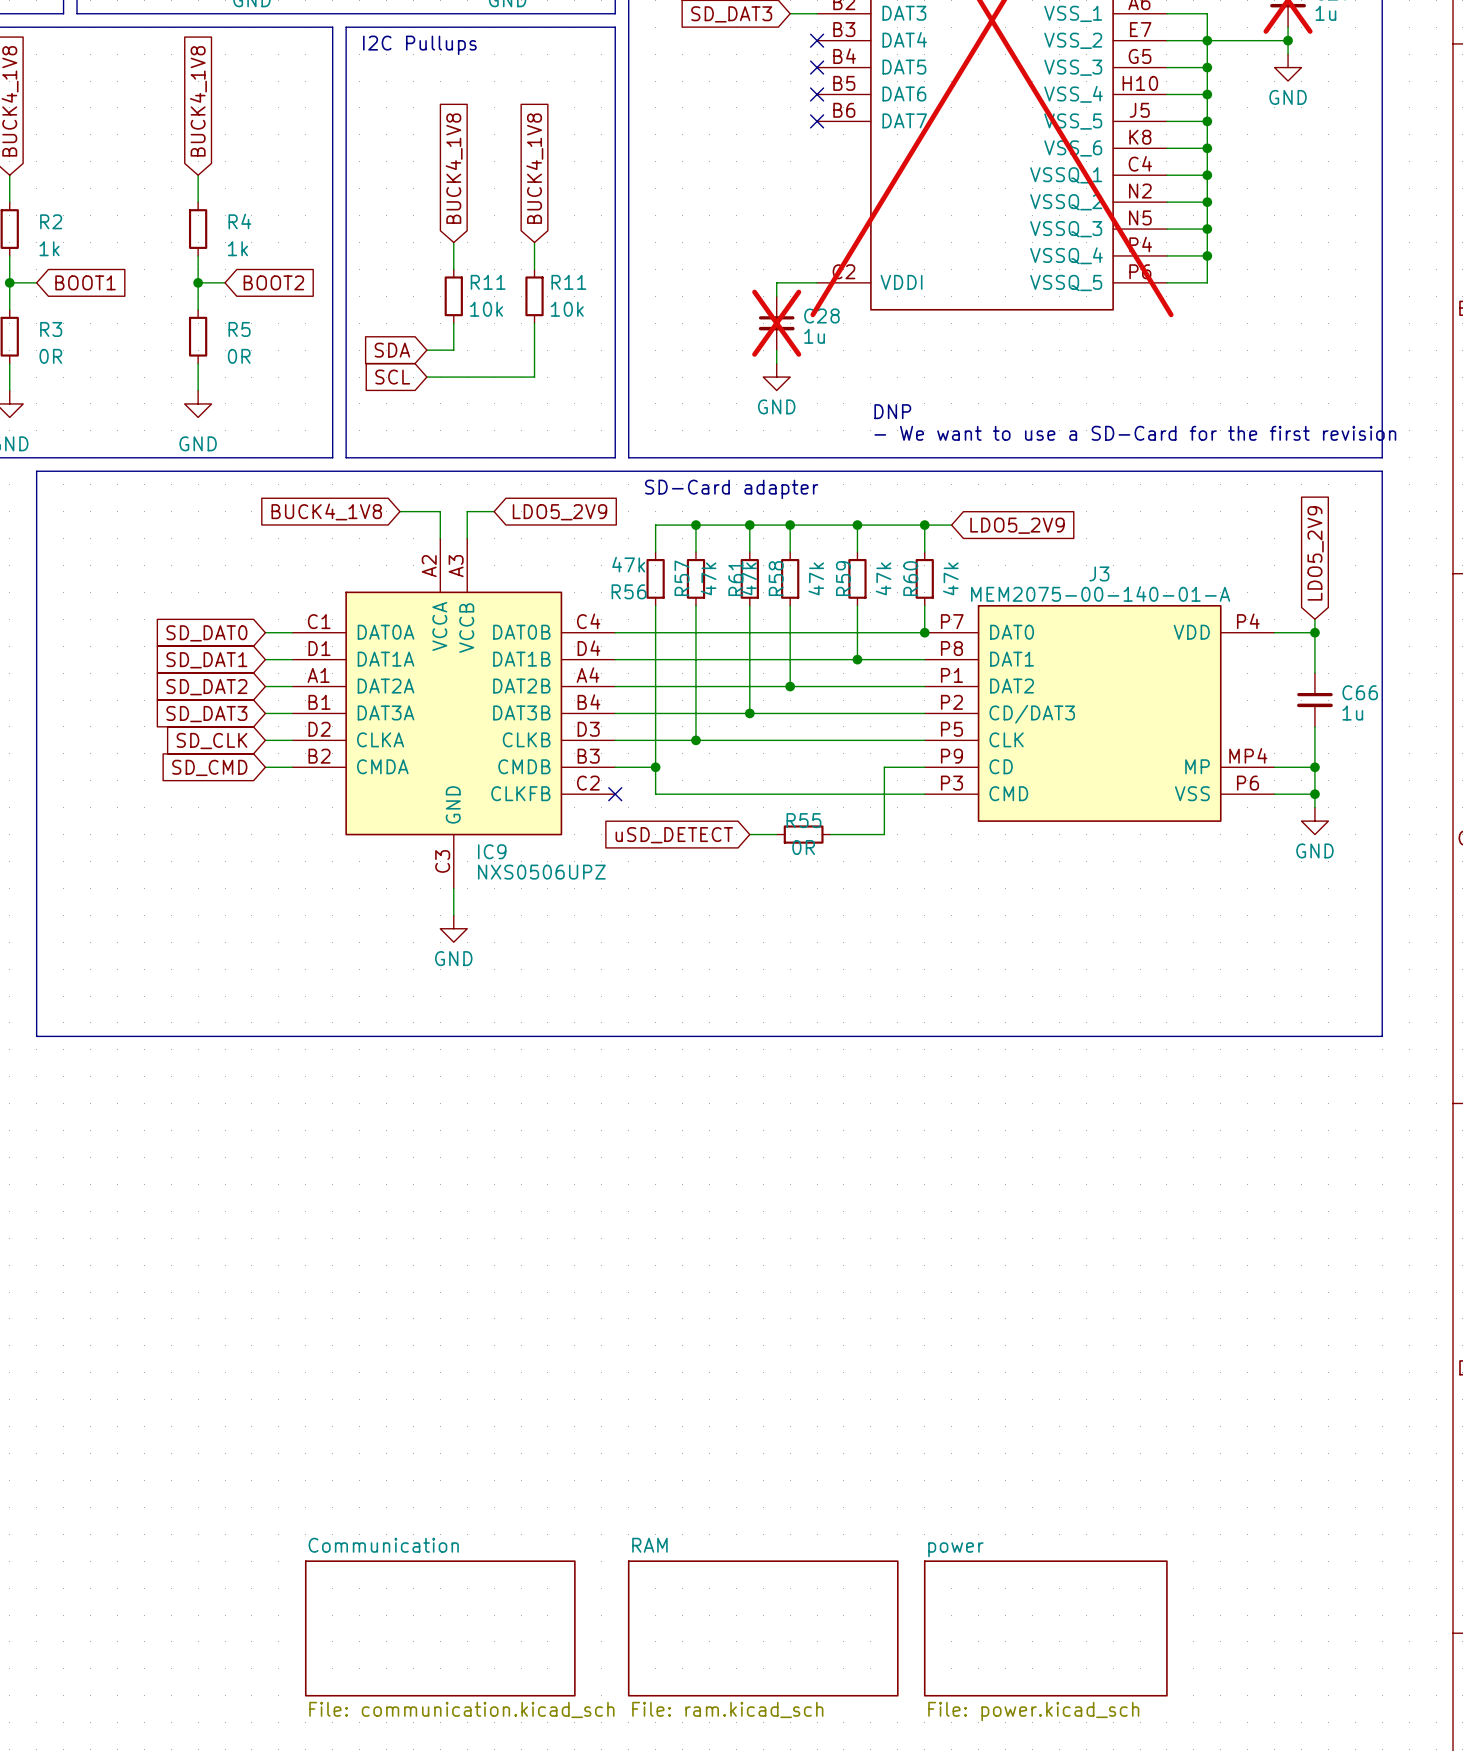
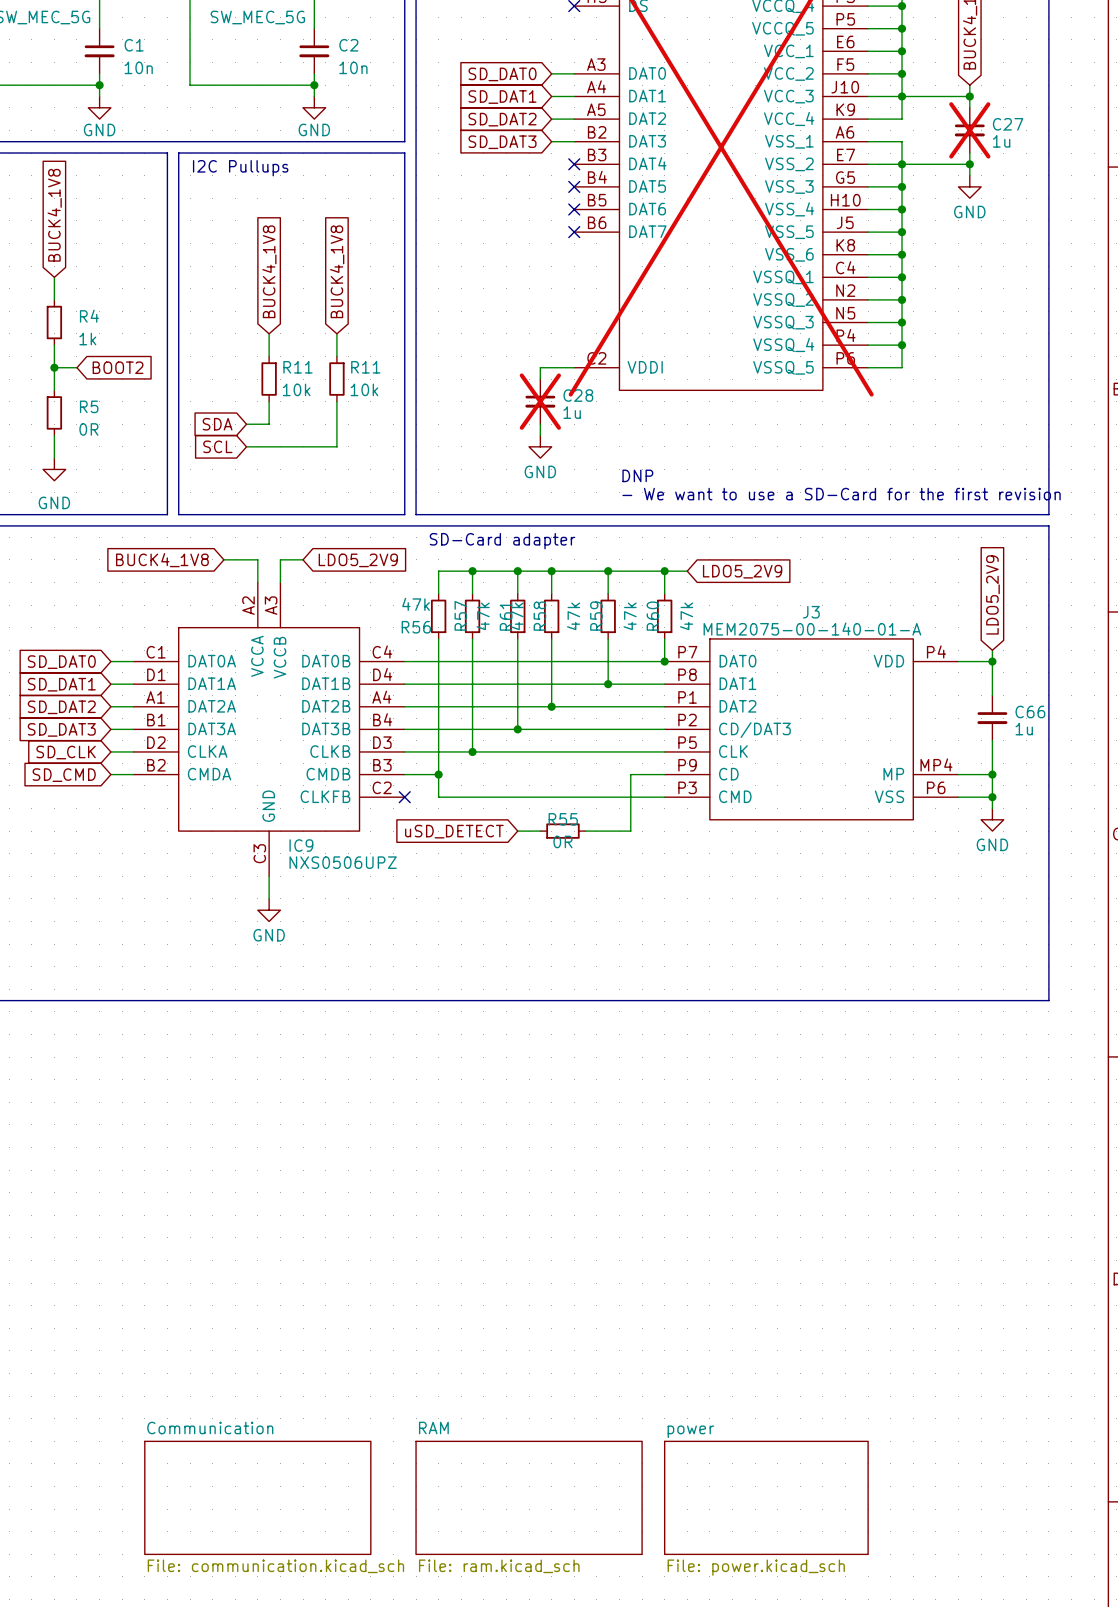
IC9 symbol: [292, 538, 616, 889] -> [133, 582, 405, 877]
J3 symbol: [924, 605, 1275, 822] -> [664, 638, 959, 821]

